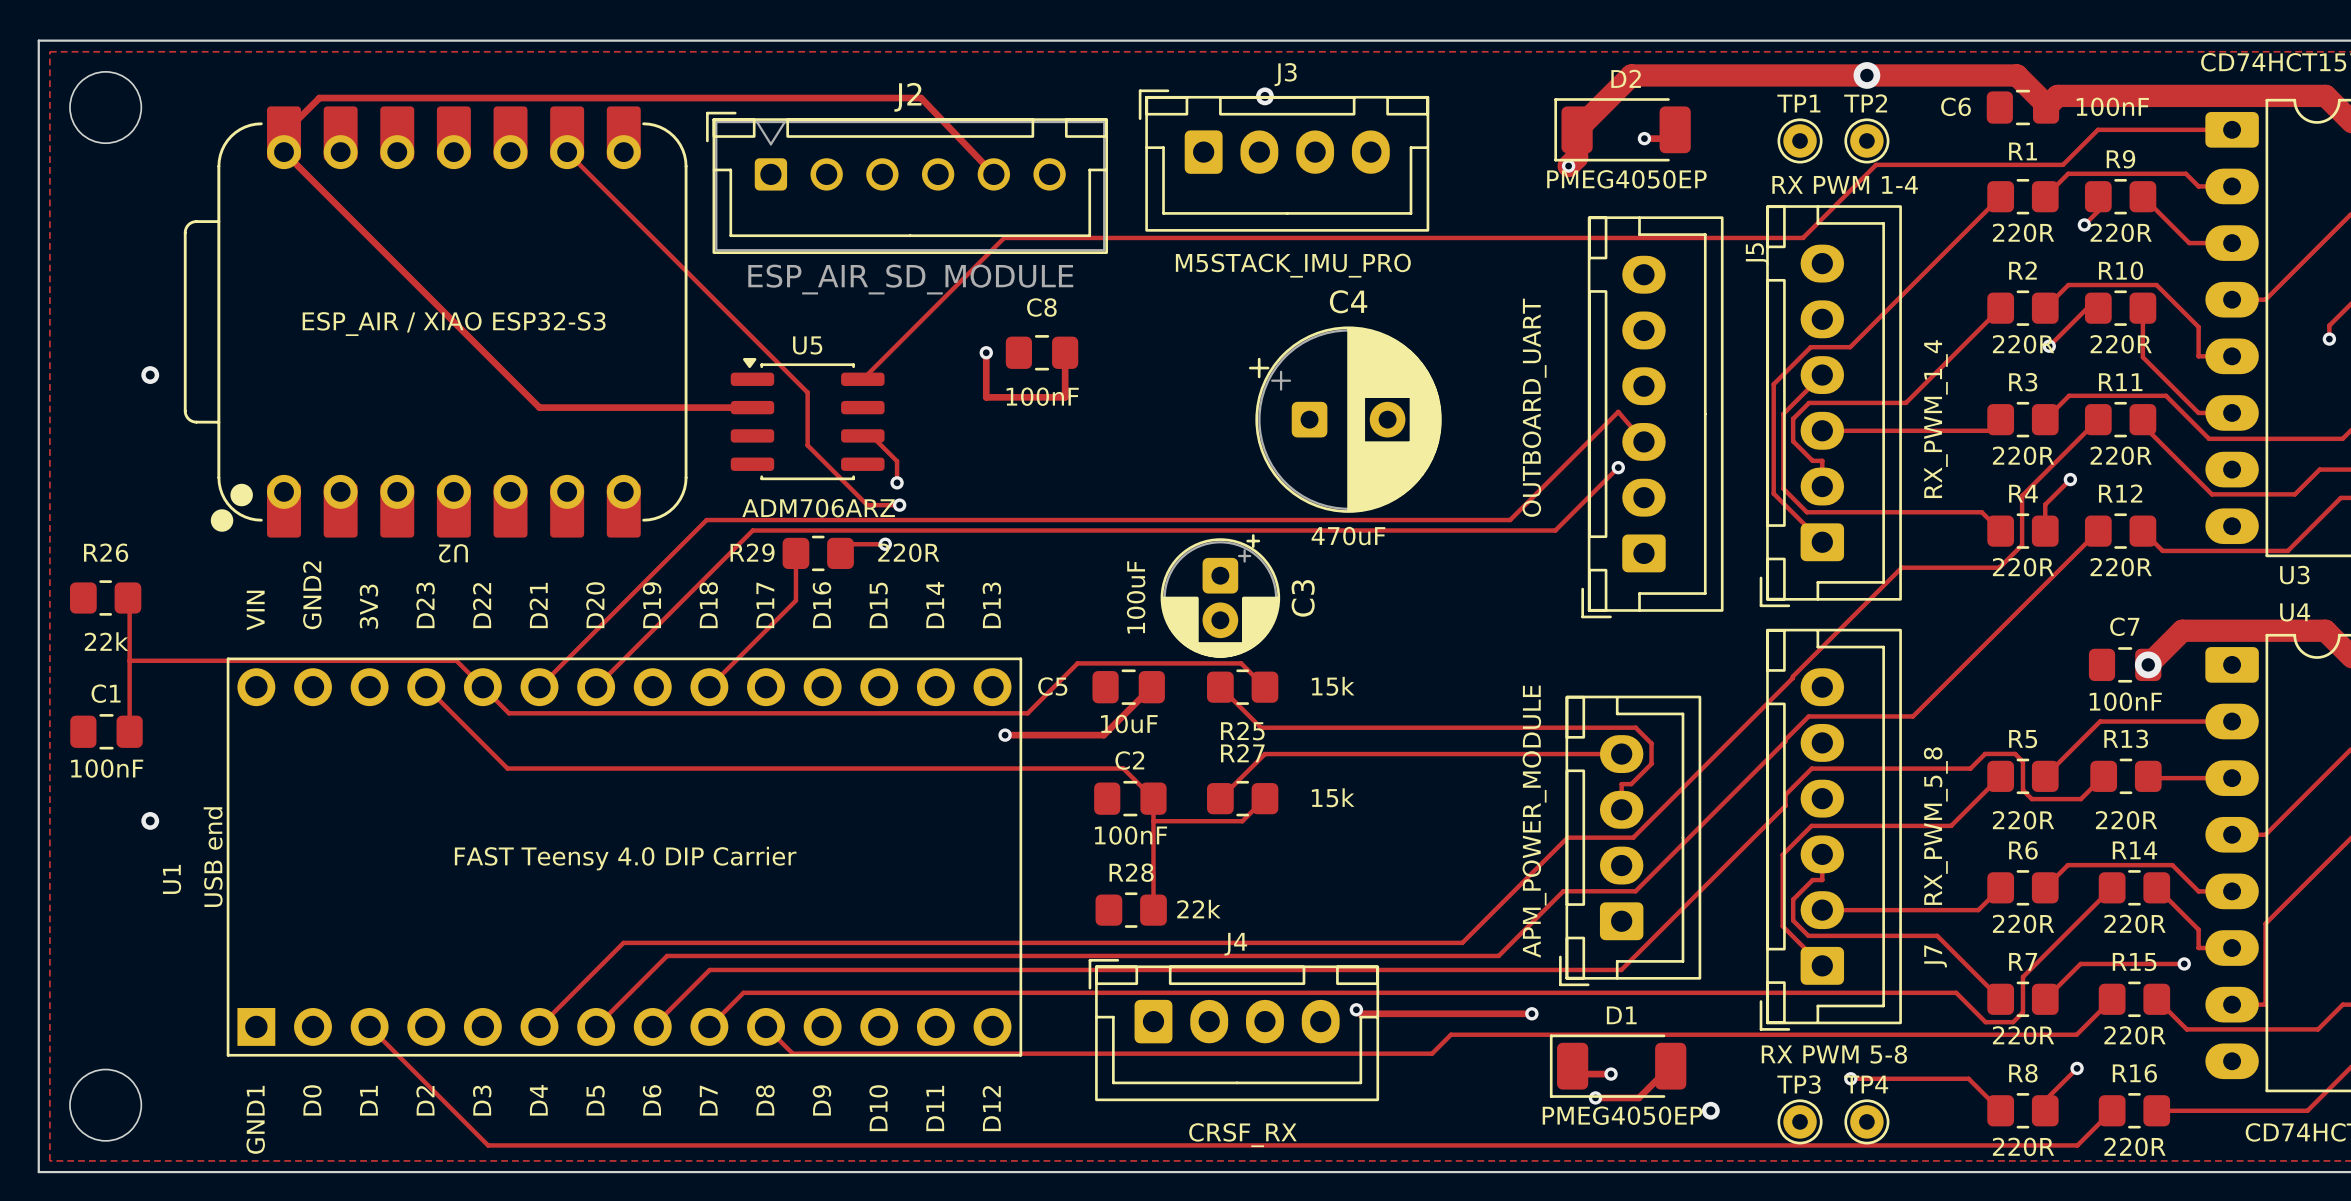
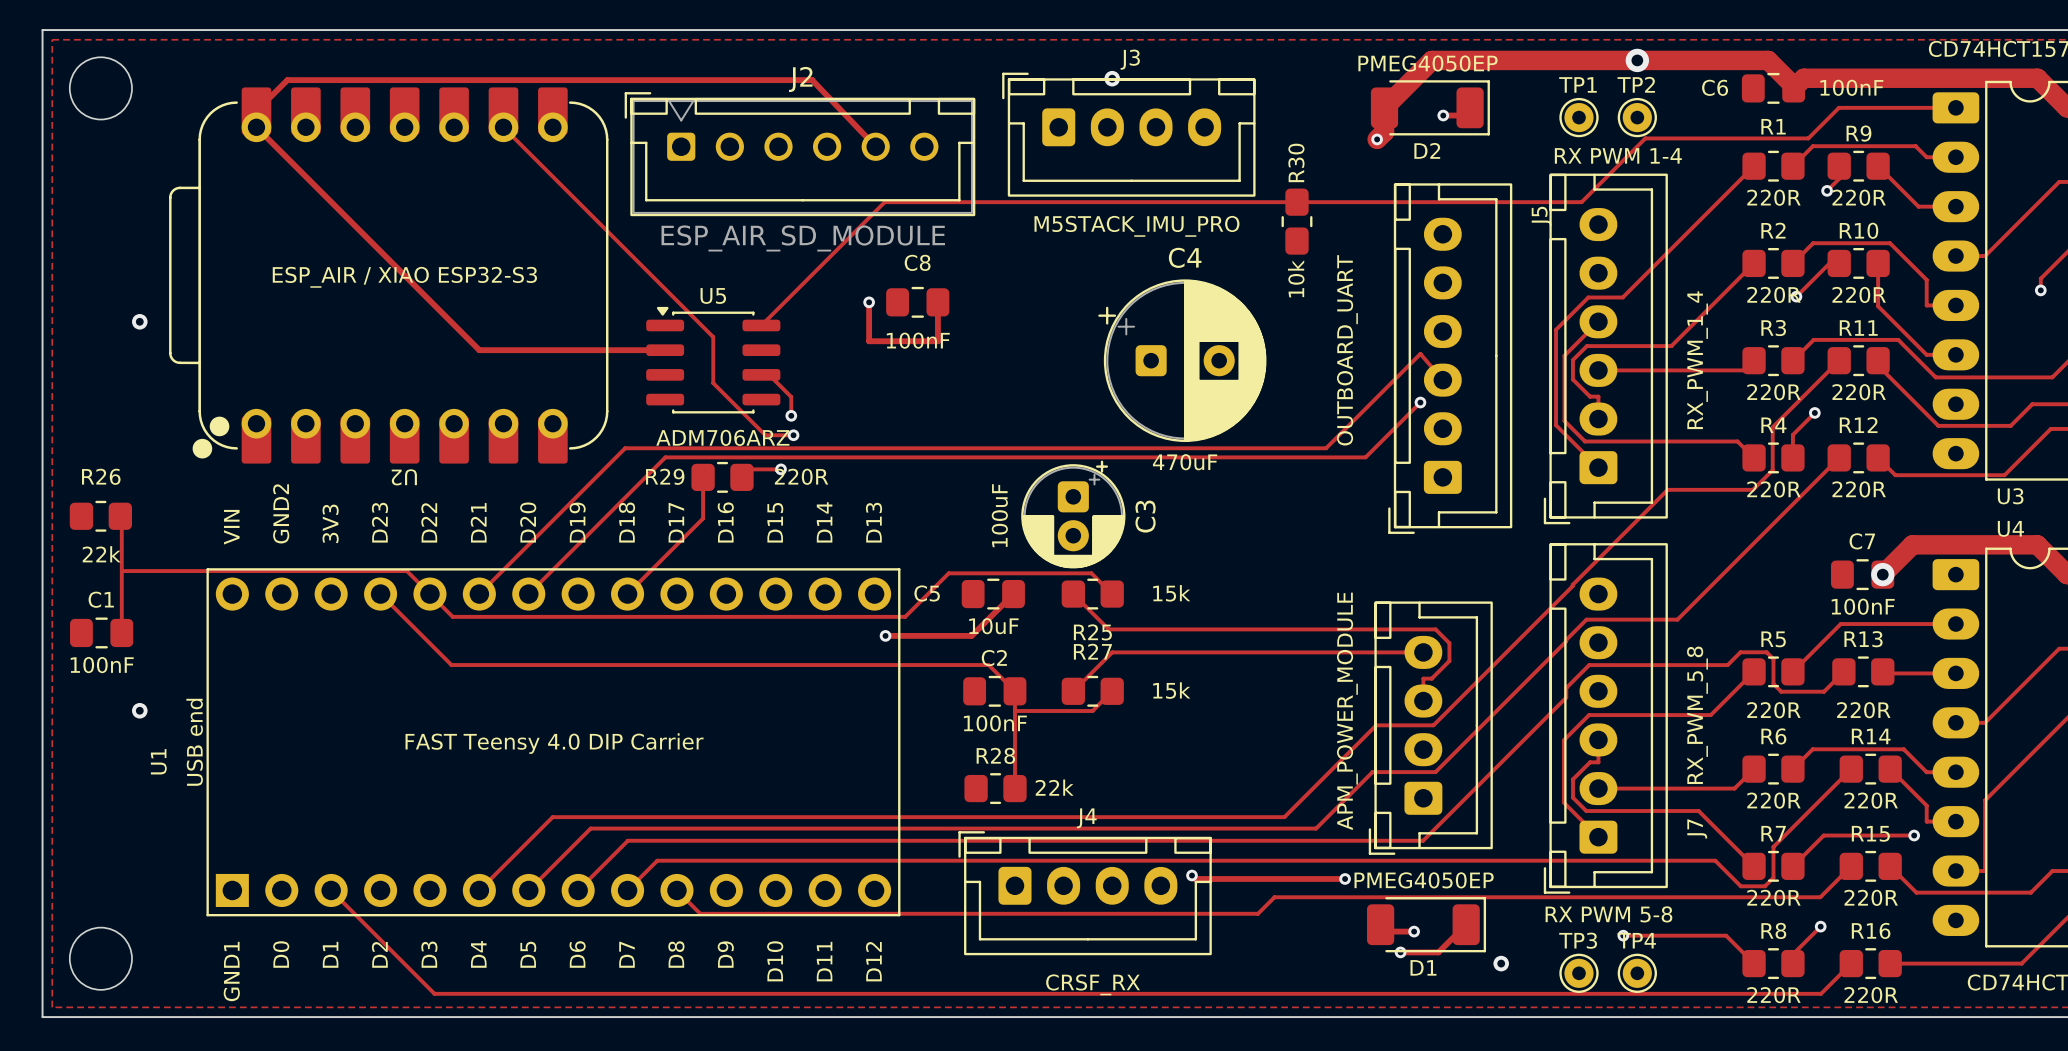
D2 rotation: 0° (1622, 129) -> 180° (1430, 107)
R30: none -> 10k (1296, 221)
D1 rotation: 0° (1618, 1066) -> 180° (1426, 924)

